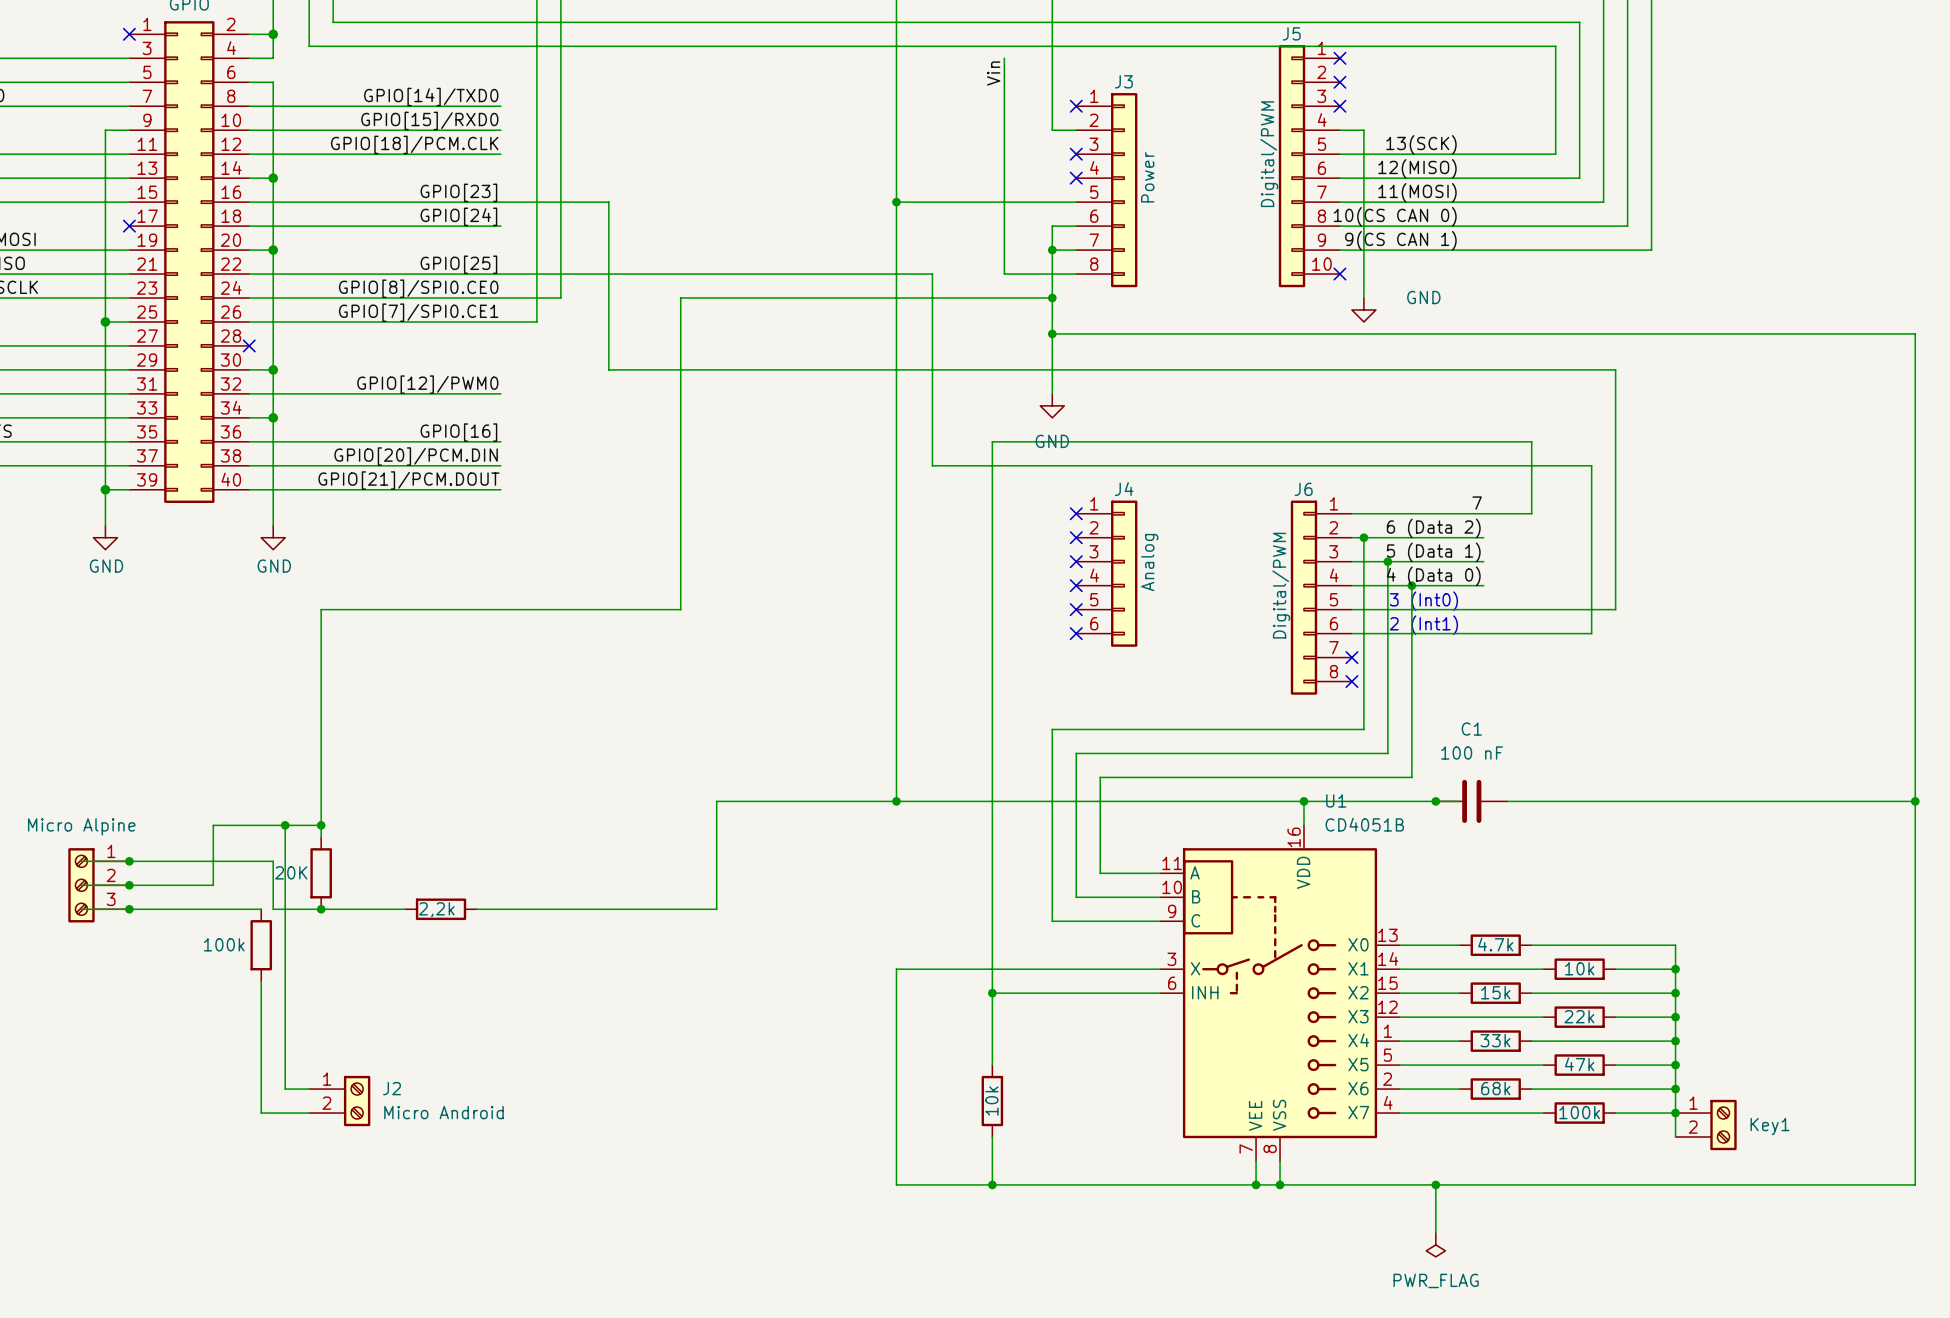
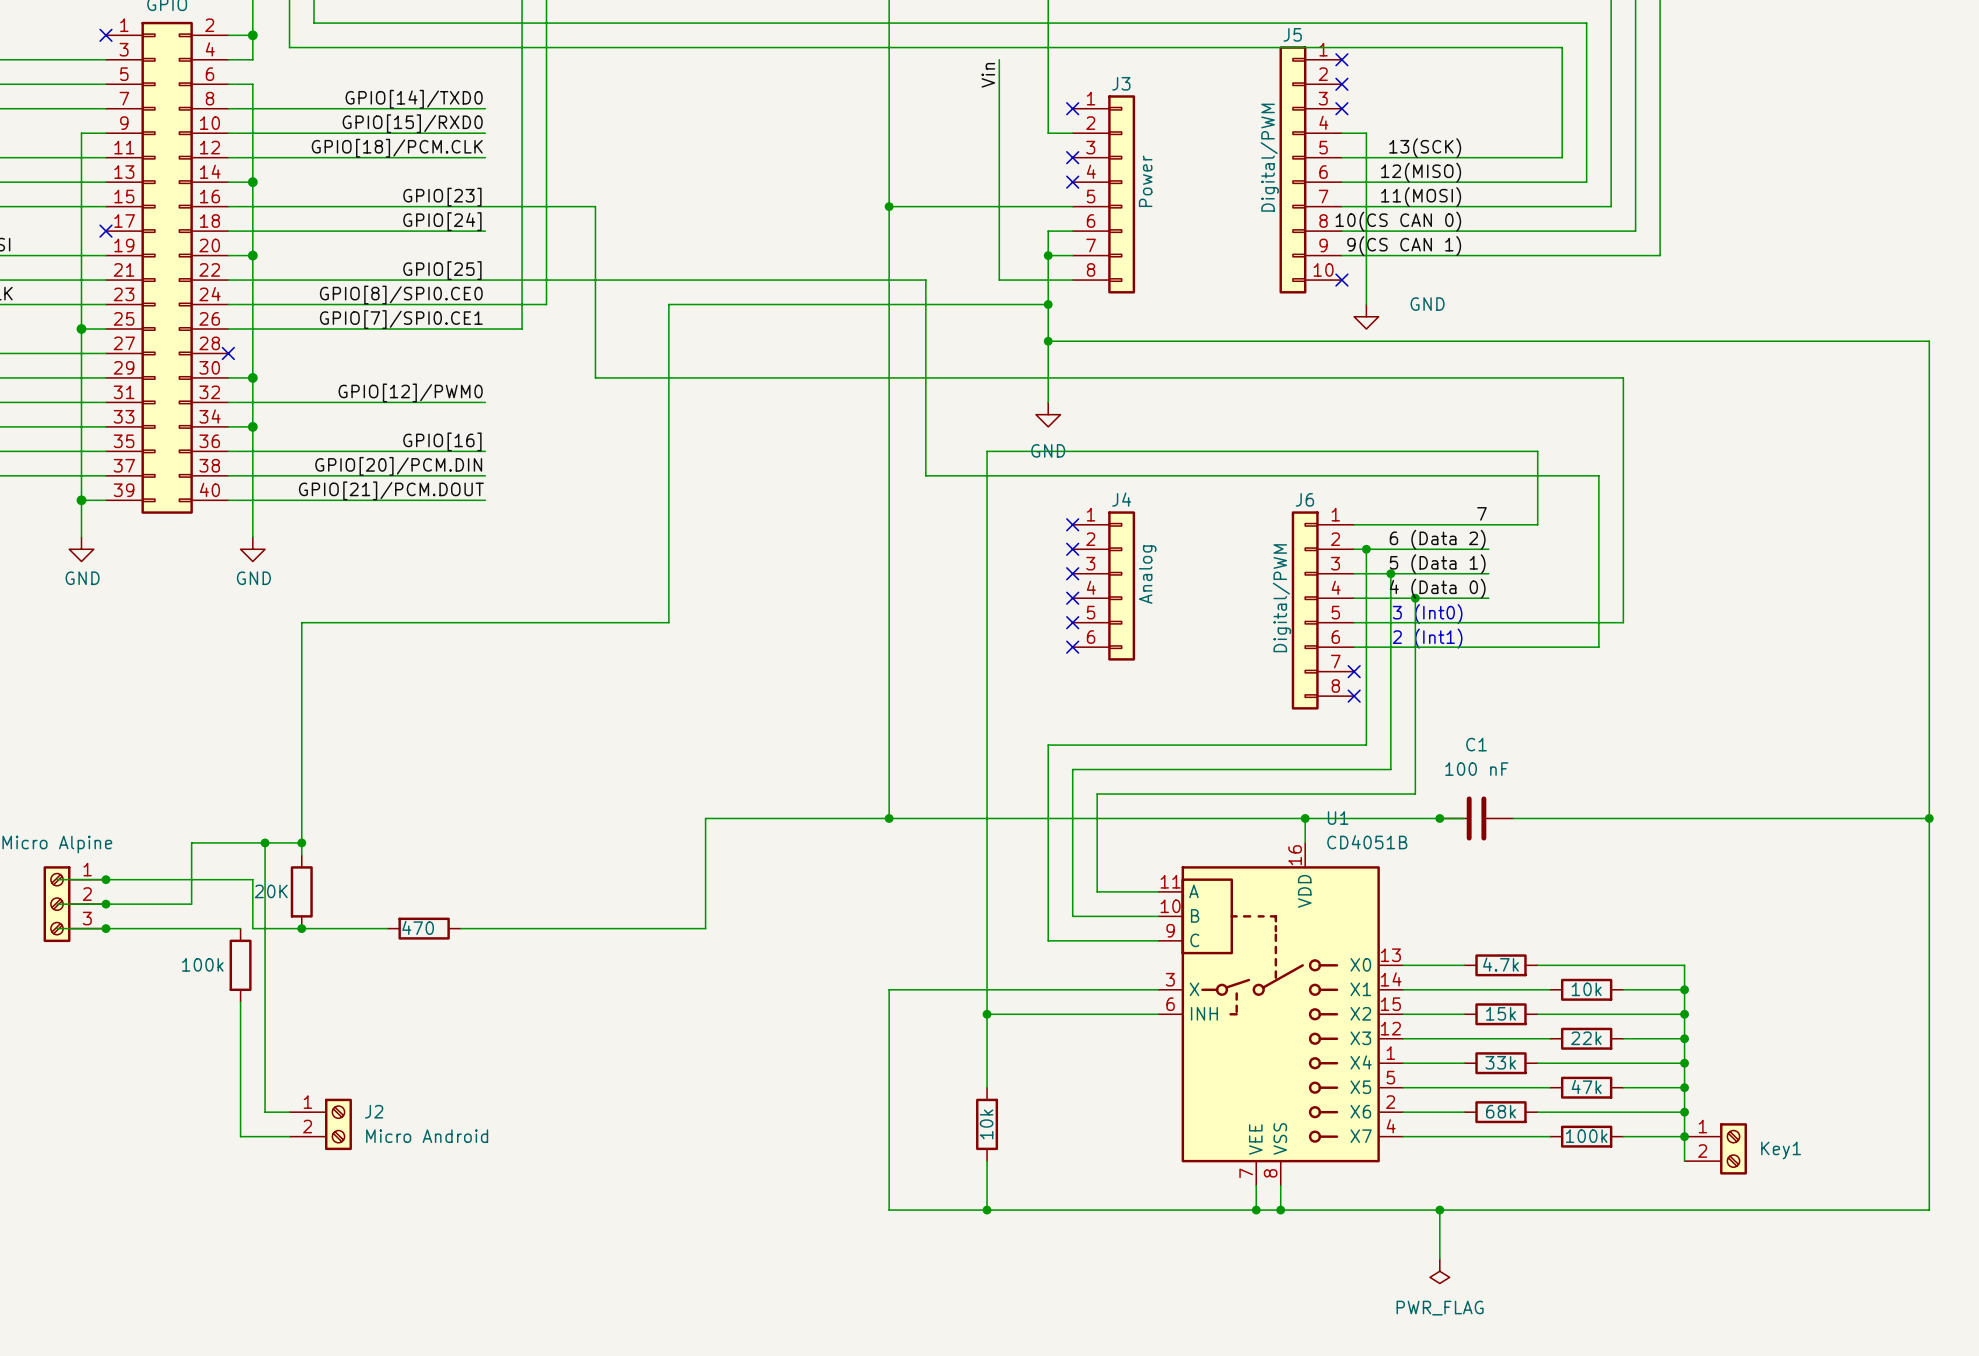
part value: 2,2k (436, 909) -> 470 (418, 927)

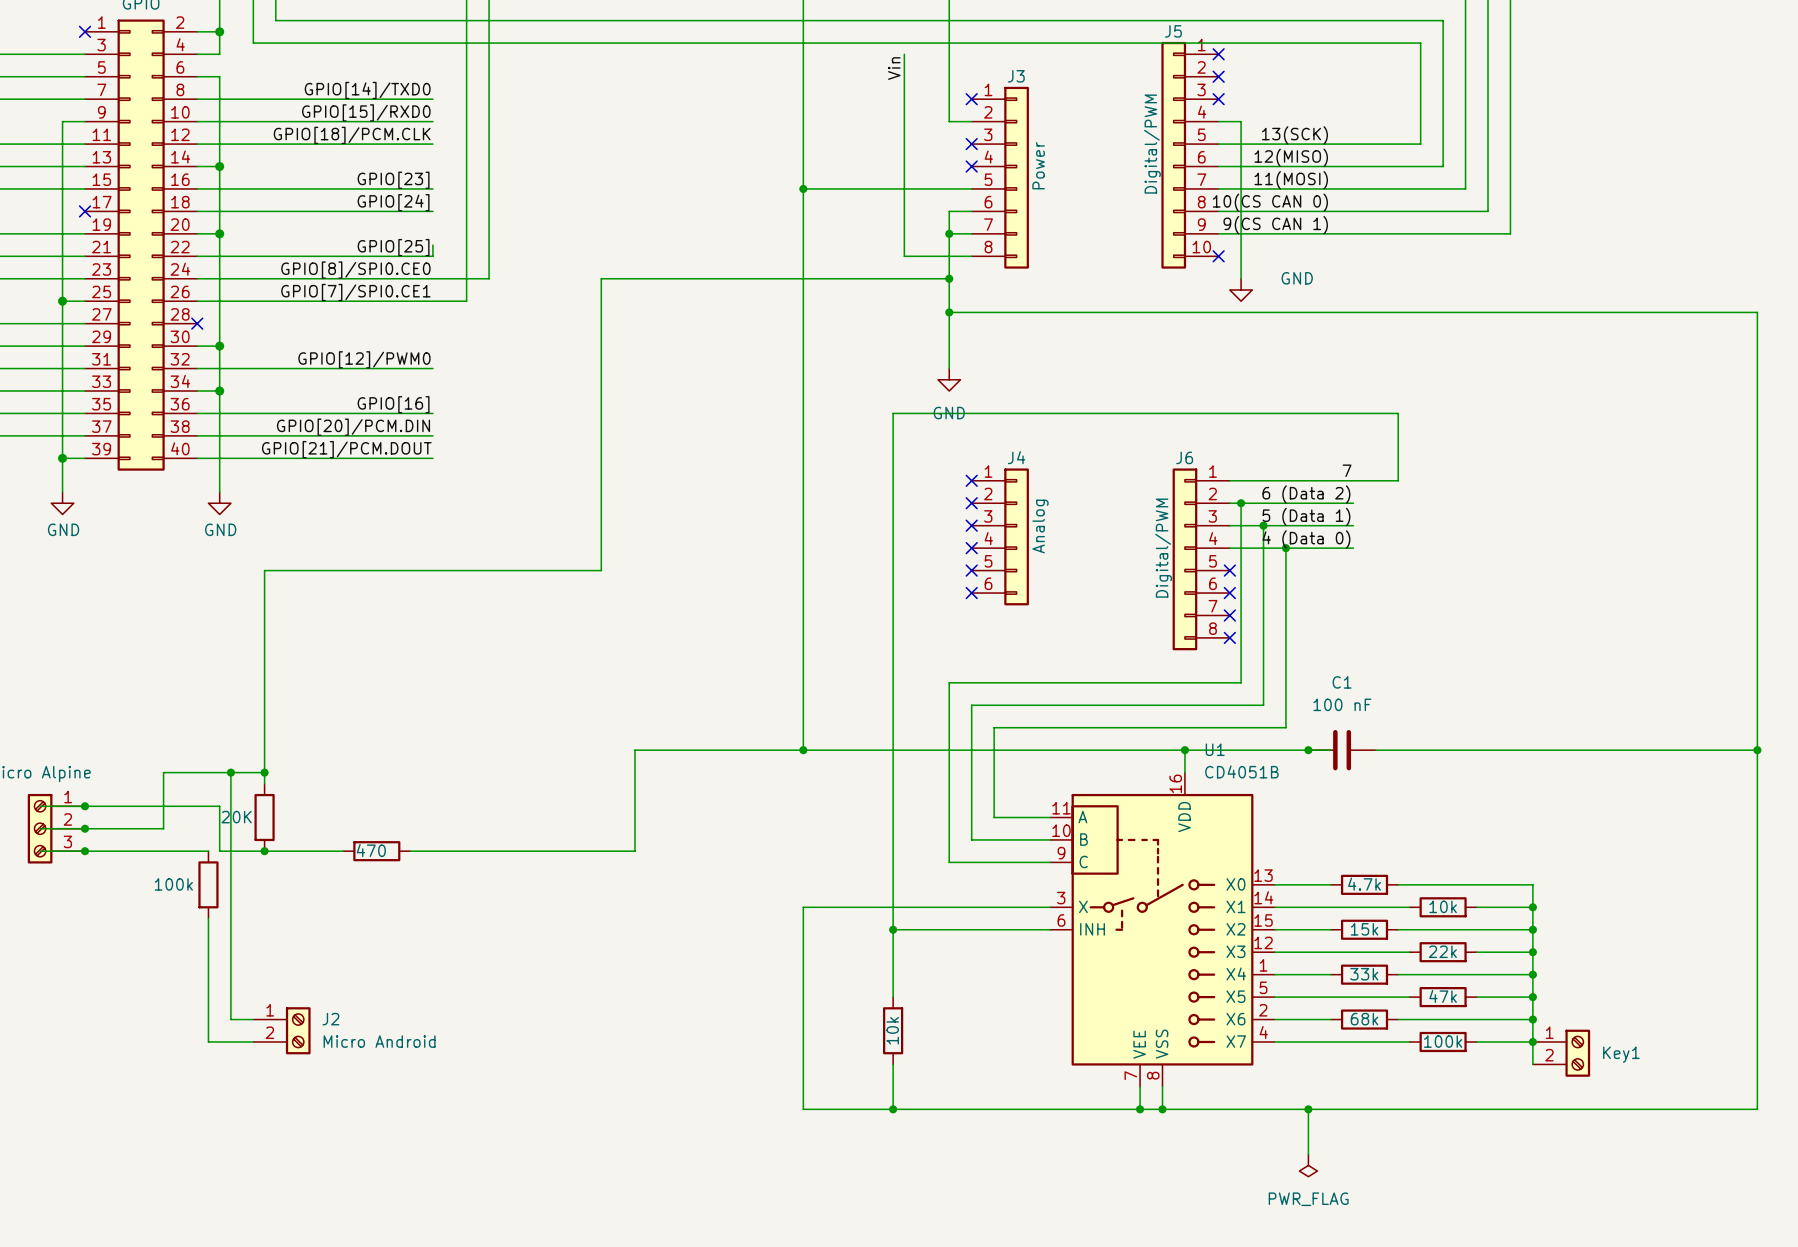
wire: (485, 206) (595, 206) (595, 377) (1623, 377) (1623, 622) (1354, 622) -> none
wire: (485, 280) (925, 280) (925, 475) (1598, 475) (1598, 647) (1354, 647) -> (432, 256) (432, 245)
text: 3 (Int0) (1427, 614) -> none
no-connect mark: none -> (1229, 570)
text: 2 (Int1) (1427, 638) -> none
no-connect mark: none -> (1229, 593)

